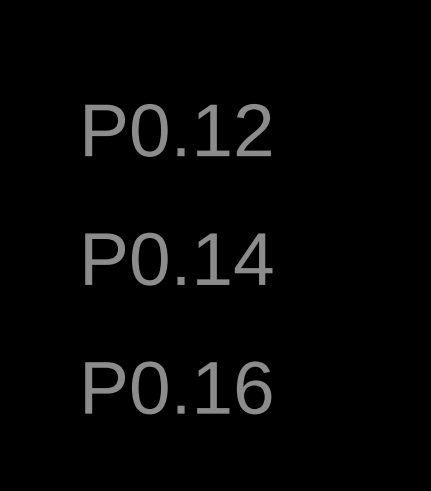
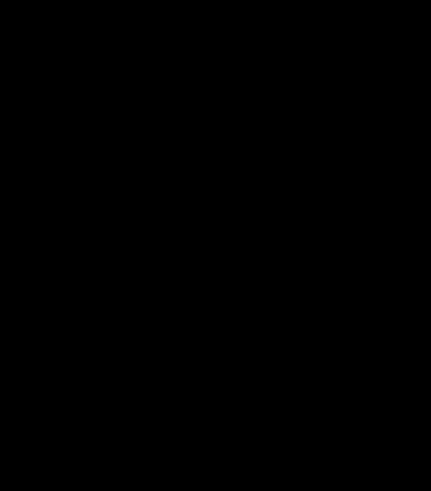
text: P0.12 (178, 130) -> none
text: P0.14 (178, 259) -> none
text: P0.16 (178, 387) -> none

